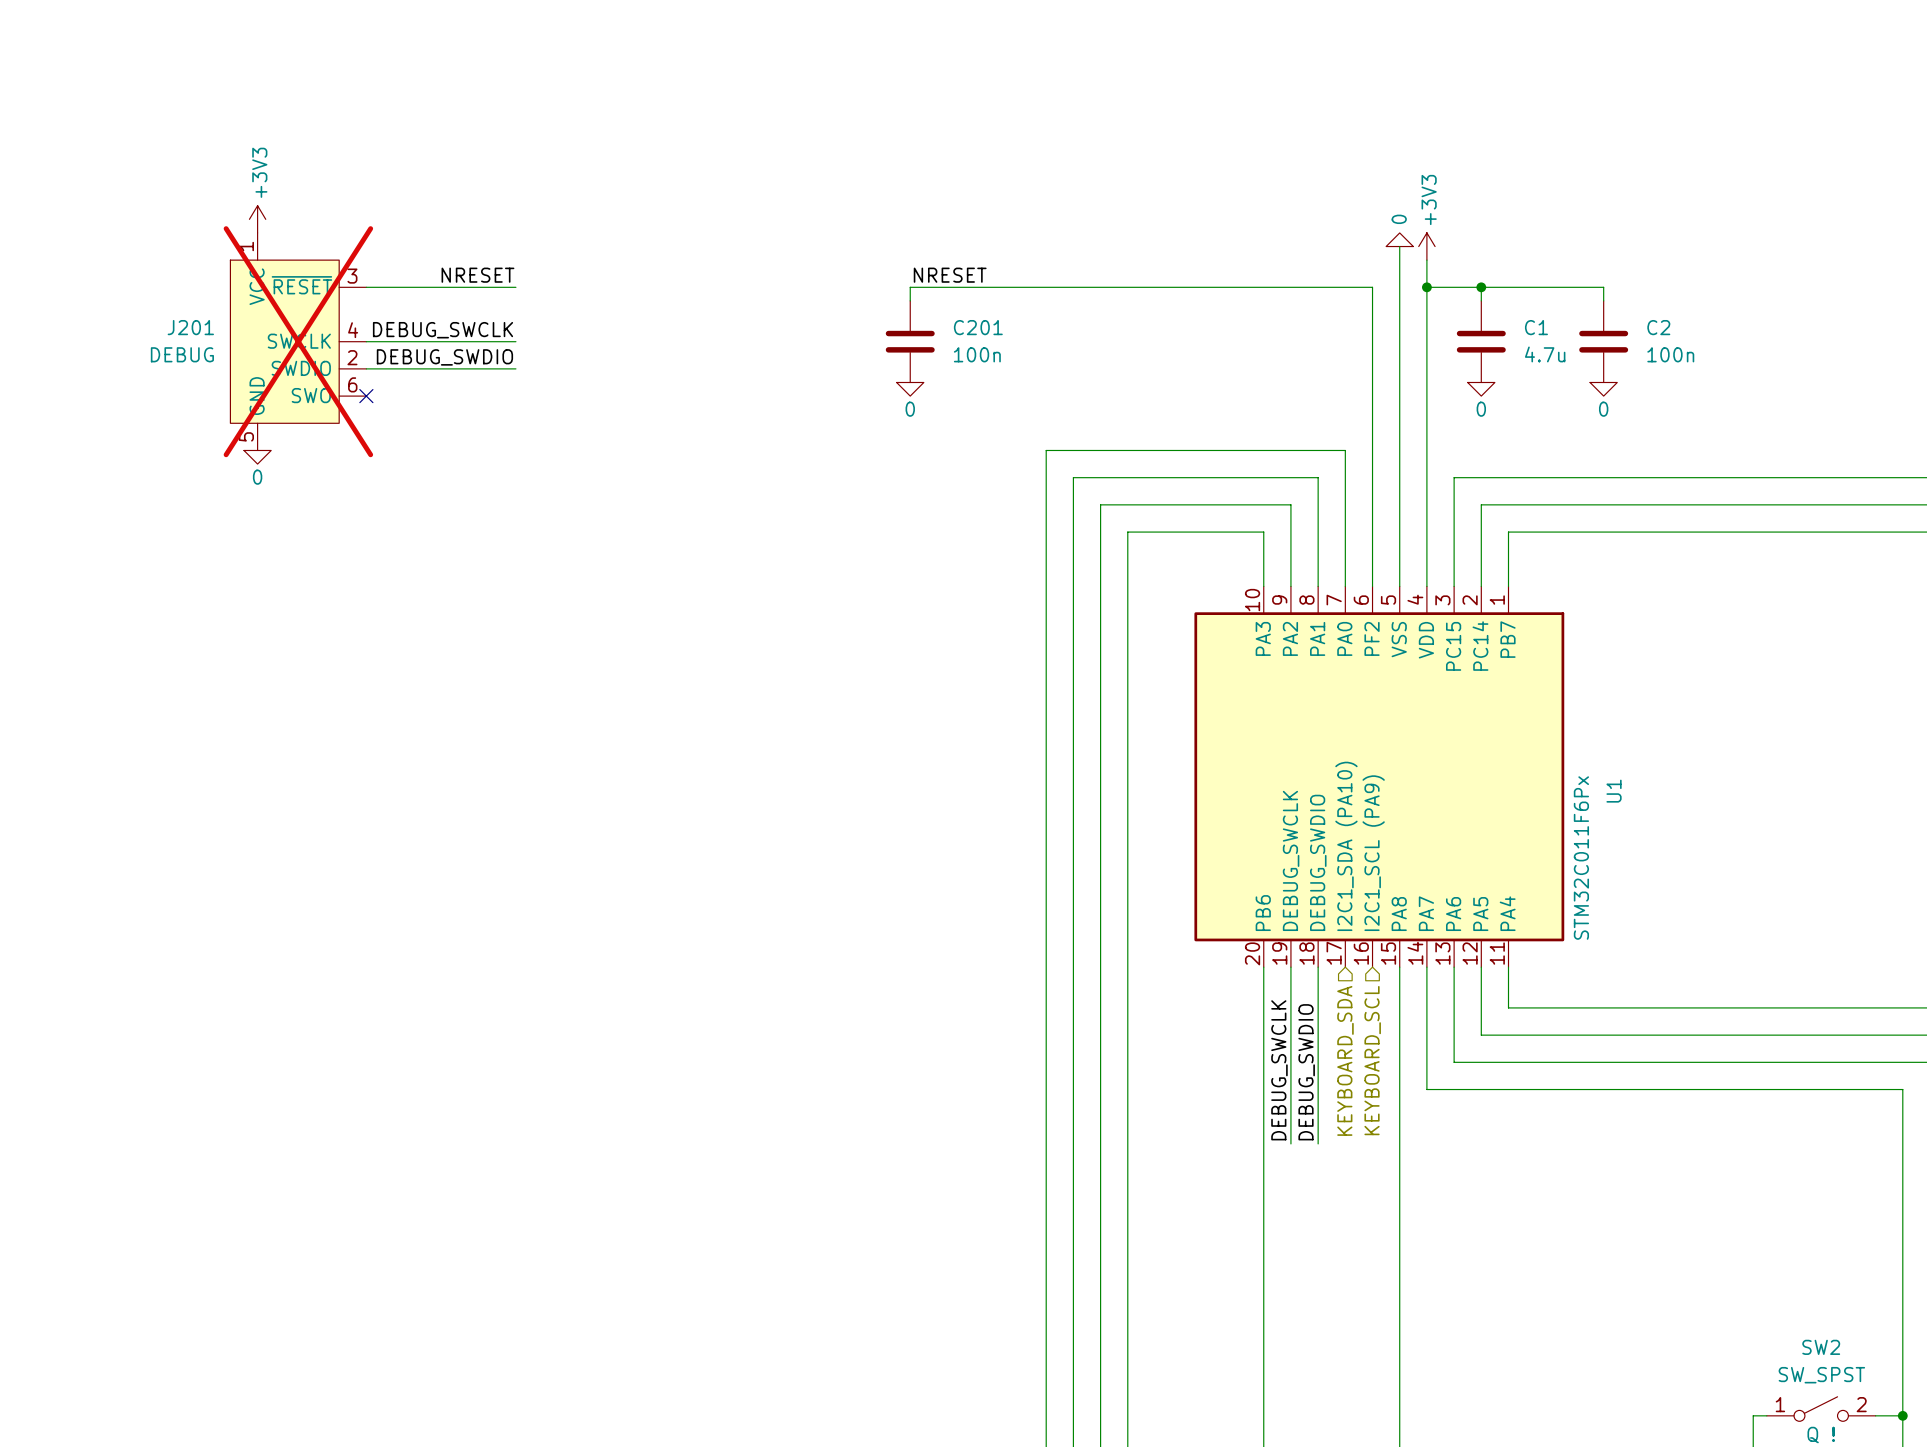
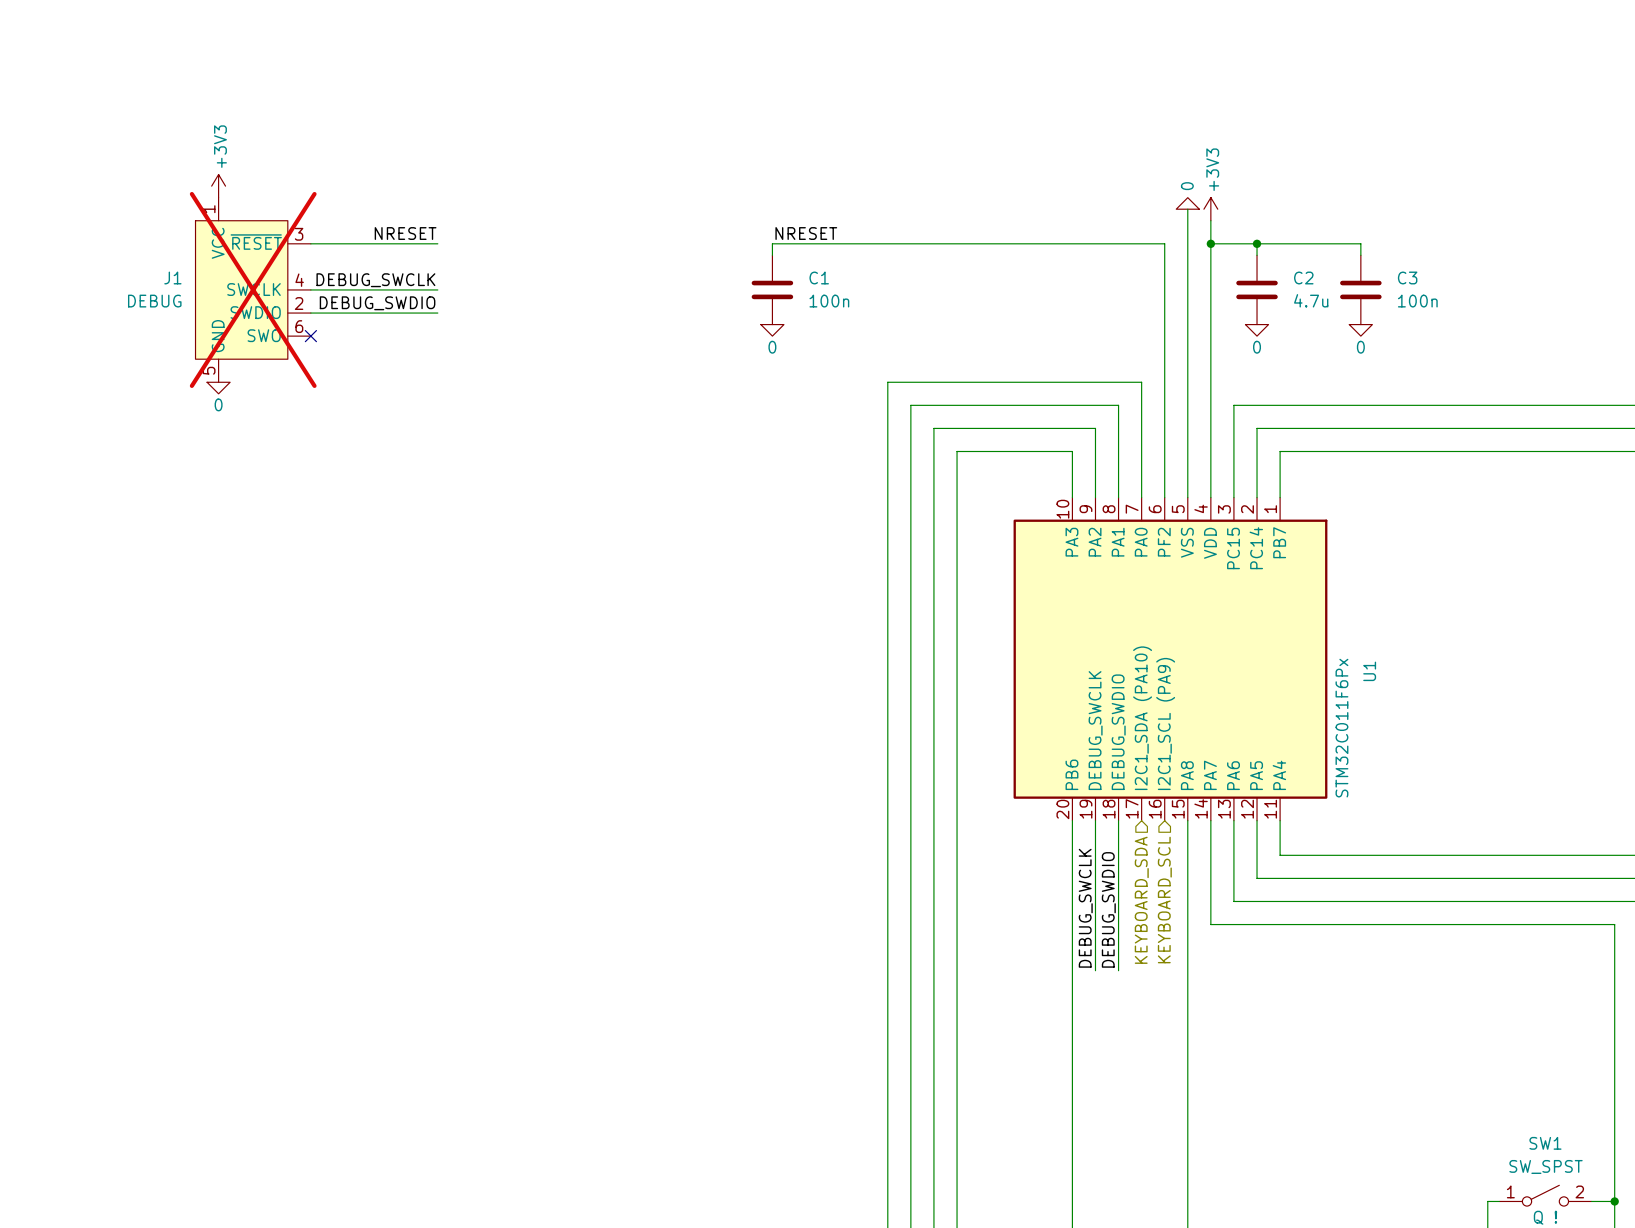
J201 name: J201 (190, 327) -> J1 (172, 277)
C201 name: C201 (978, 327) -> C1 (819, 277)
C1 name: C1 (1536, 327) -> C2 (1303, 277)
C2 name: C2 (1658, 327) -> C3 (1407, 277)
SW2 name: SW2 (1821, 1347) -> SW1 (1545, 1143)

